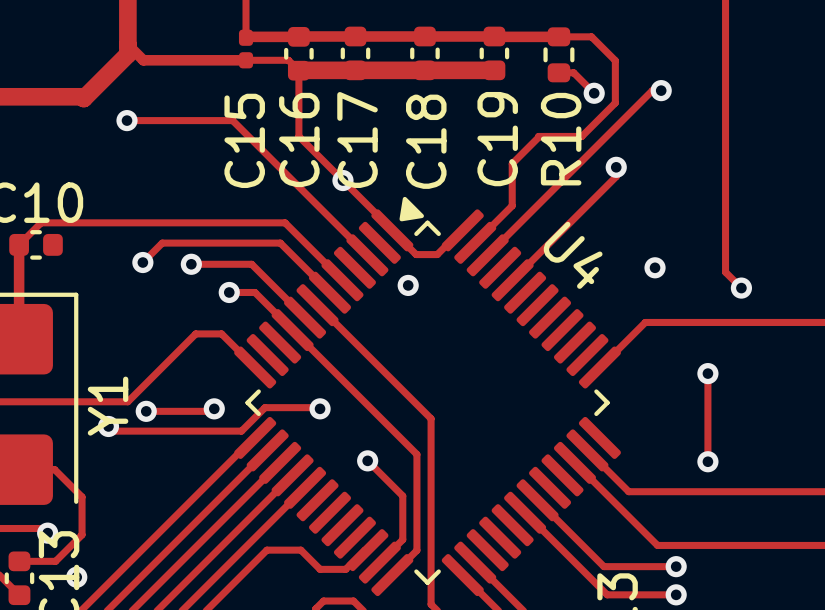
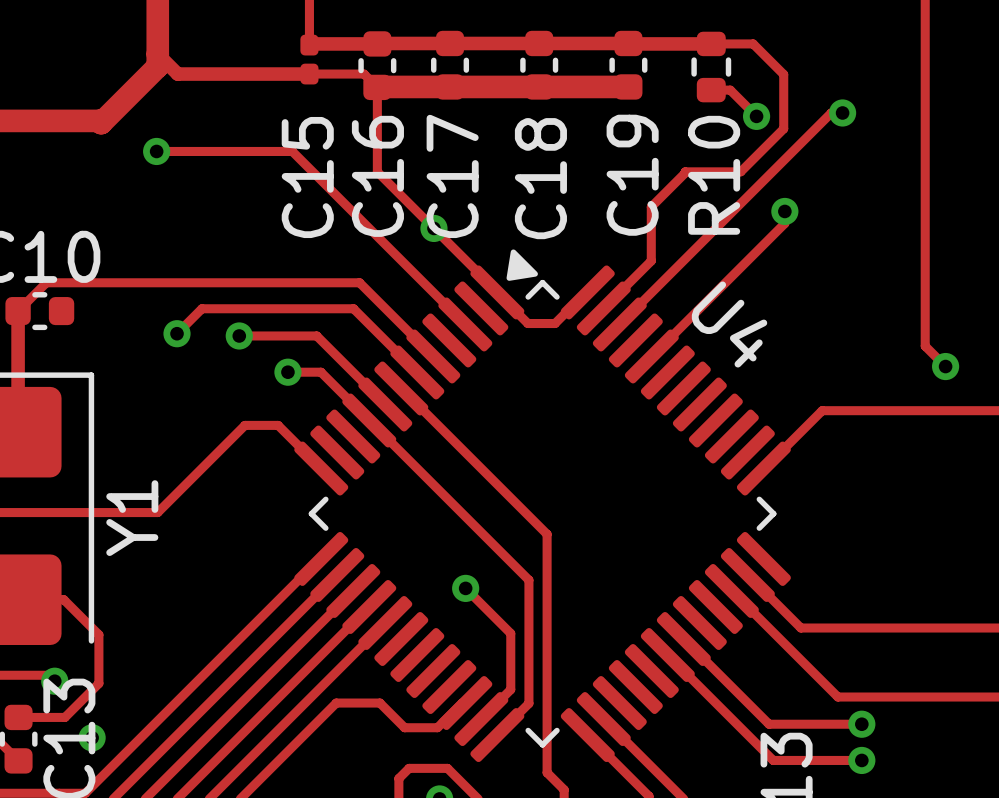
via: (655, 267) -> none
via: (408, 285) -> none
track: (707, 373) (707, 461) -> none
via: (707, 373) -> none
track: (214, 408) (211, 411) (146, 411) -> none
via: (214, 408) -> none
track: (320, 408) (265, 407) (241, 431) (113, 431) (108, 426) -> none
via: (320, 408) -> none
via: (146, 411) -> none
via: (108, 426) -> none
via: (707, 461) -> none

